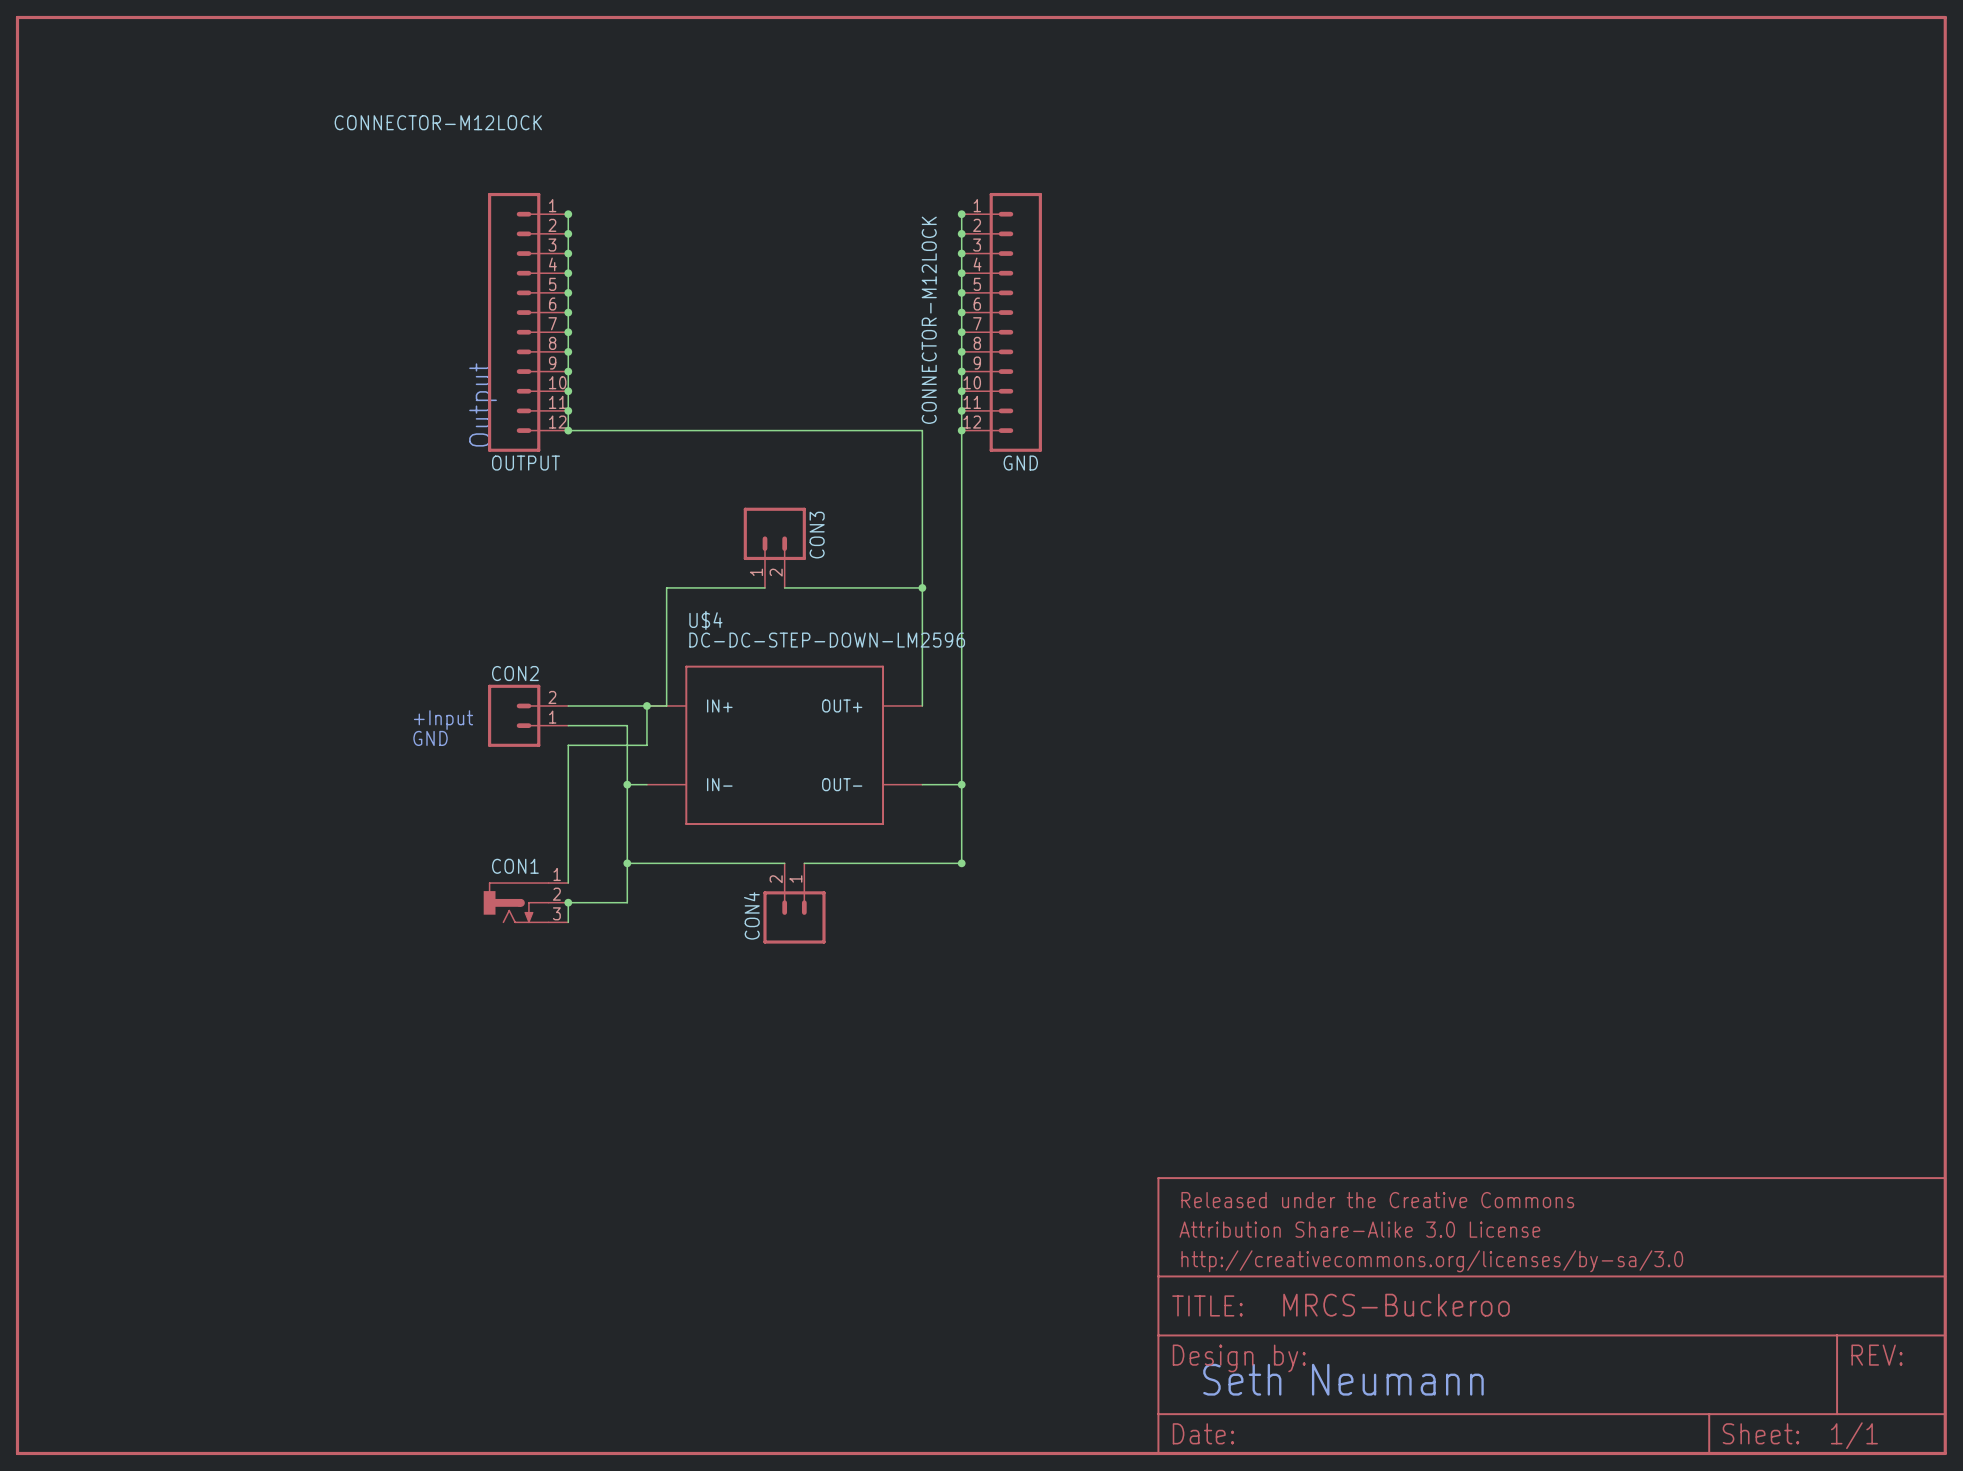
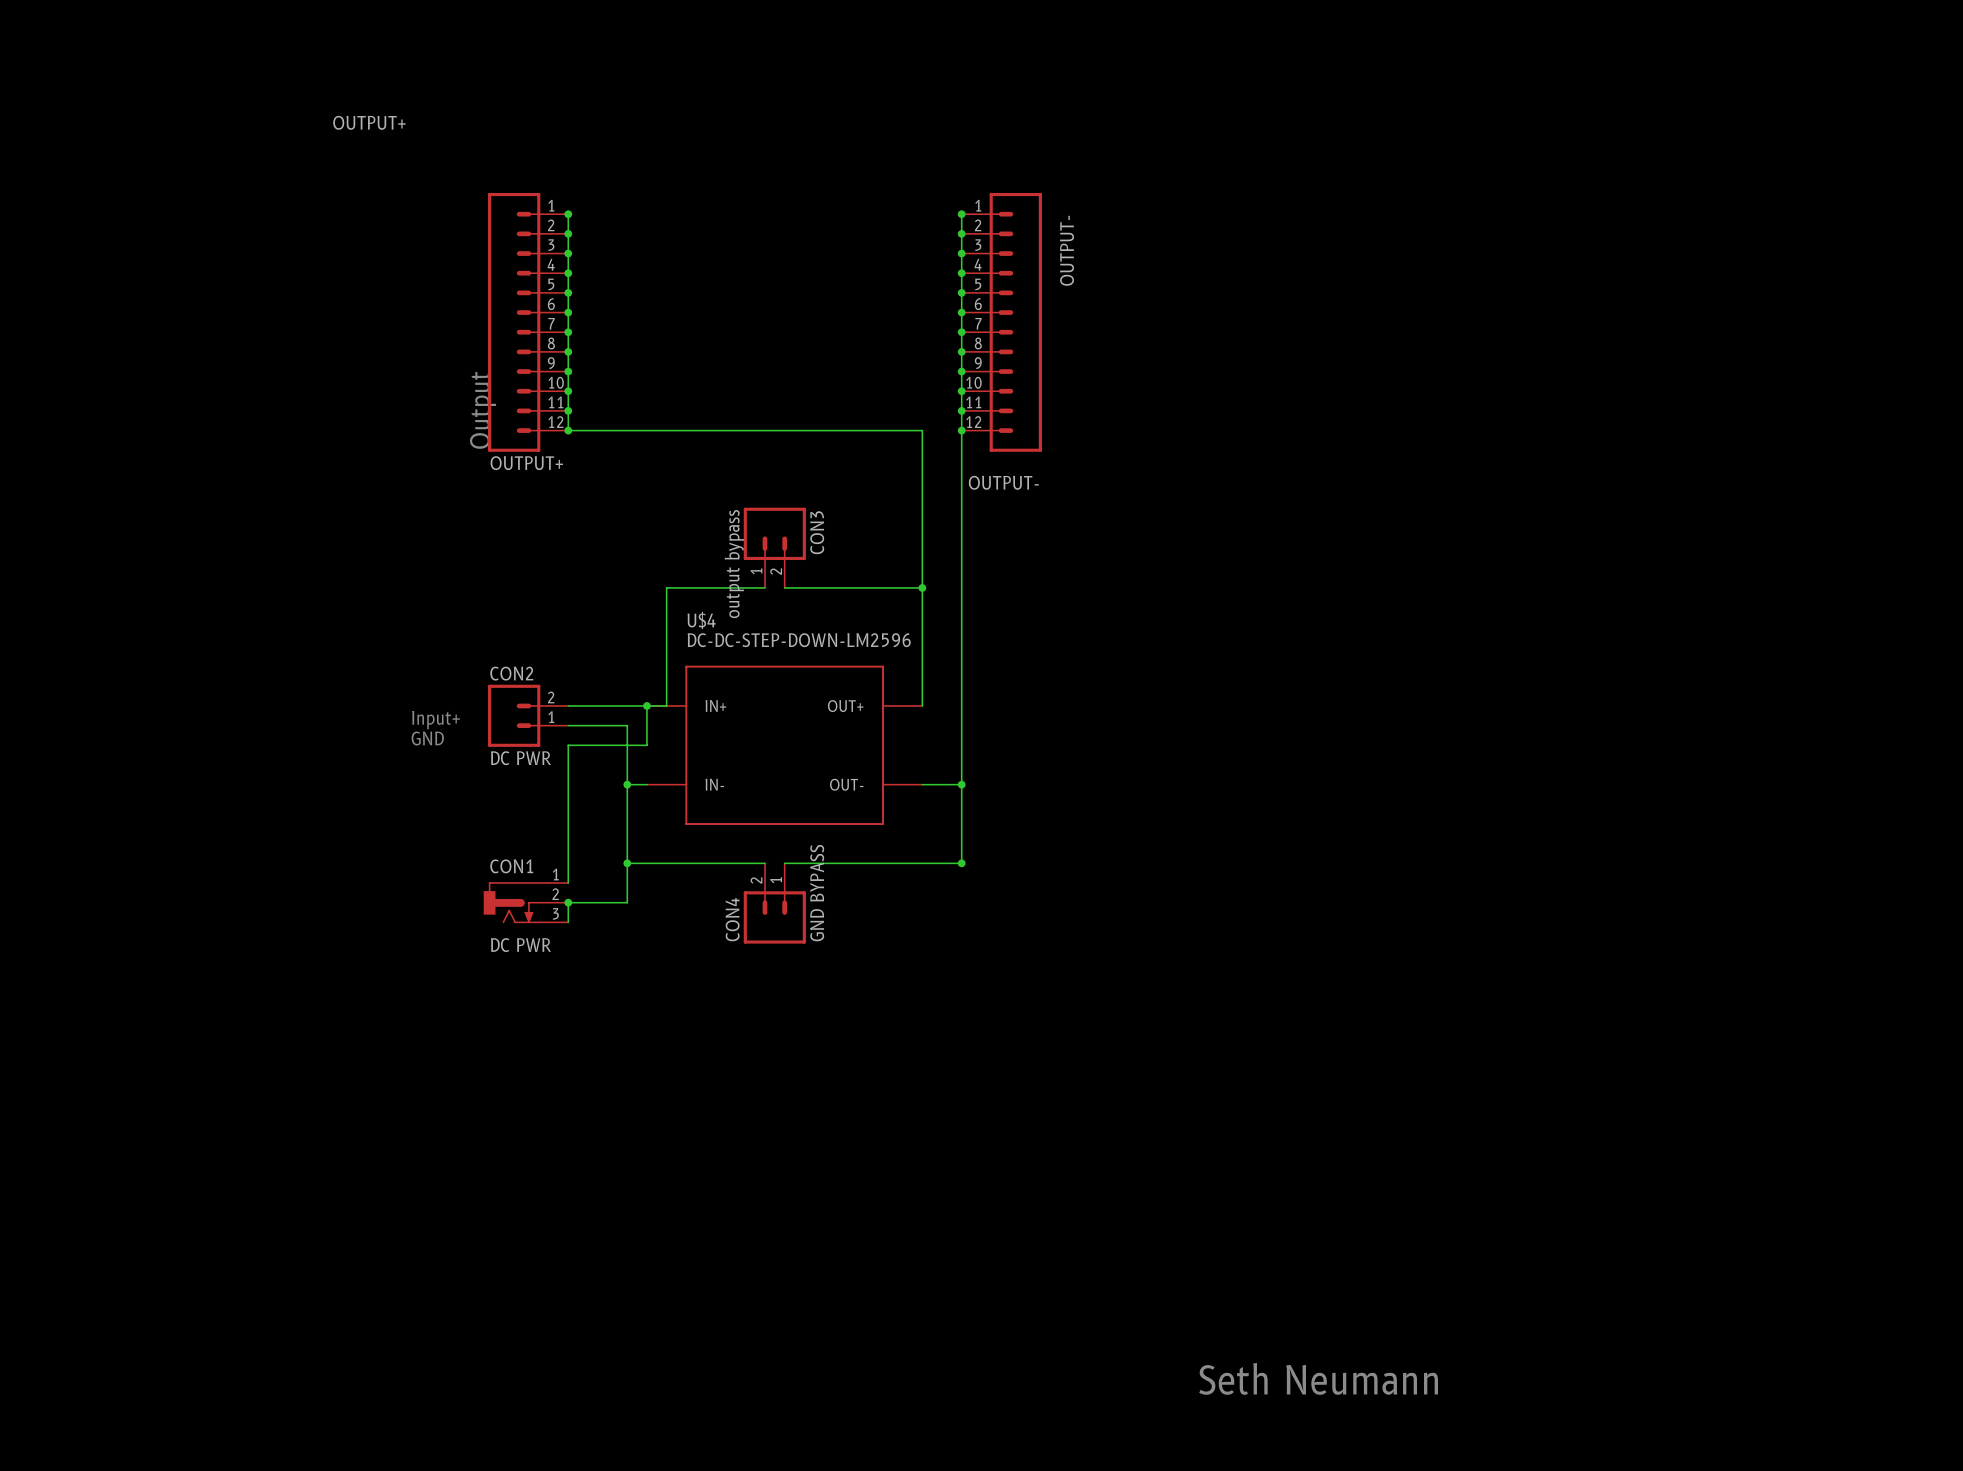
OUTPUT value: CONNECTOR-M12LOCK (438, 122) -> OUTPUT+ (369, 122)
GND value: CONNECTOR-M12LOCK (929, 320) -> OUTPUT- (1067, 250)
OUTPUT name: OUTPUT (526, 463) -> OUTPUT+ (526, 463)
GND name: GND (1020, 463) -> OUTPUT- (1003, 482)
CON3 value: none -> output bypass (734, 564)
text: +Input (443, 720) -> Input+ (436, 720)
part: (981, 735) -> none
CON2 value: none -> DC PWR (521, 758)
wire: (764, 863) (784, 863) -> (804, 863) (784, 863)
CON4 value: none -> GND BYPASS (817, 893)
CON4 position: (794, 903) -> (774, 903)
CON1 value: none -> DC PWR (521, 945)
part: (1551, 1315) -> none

